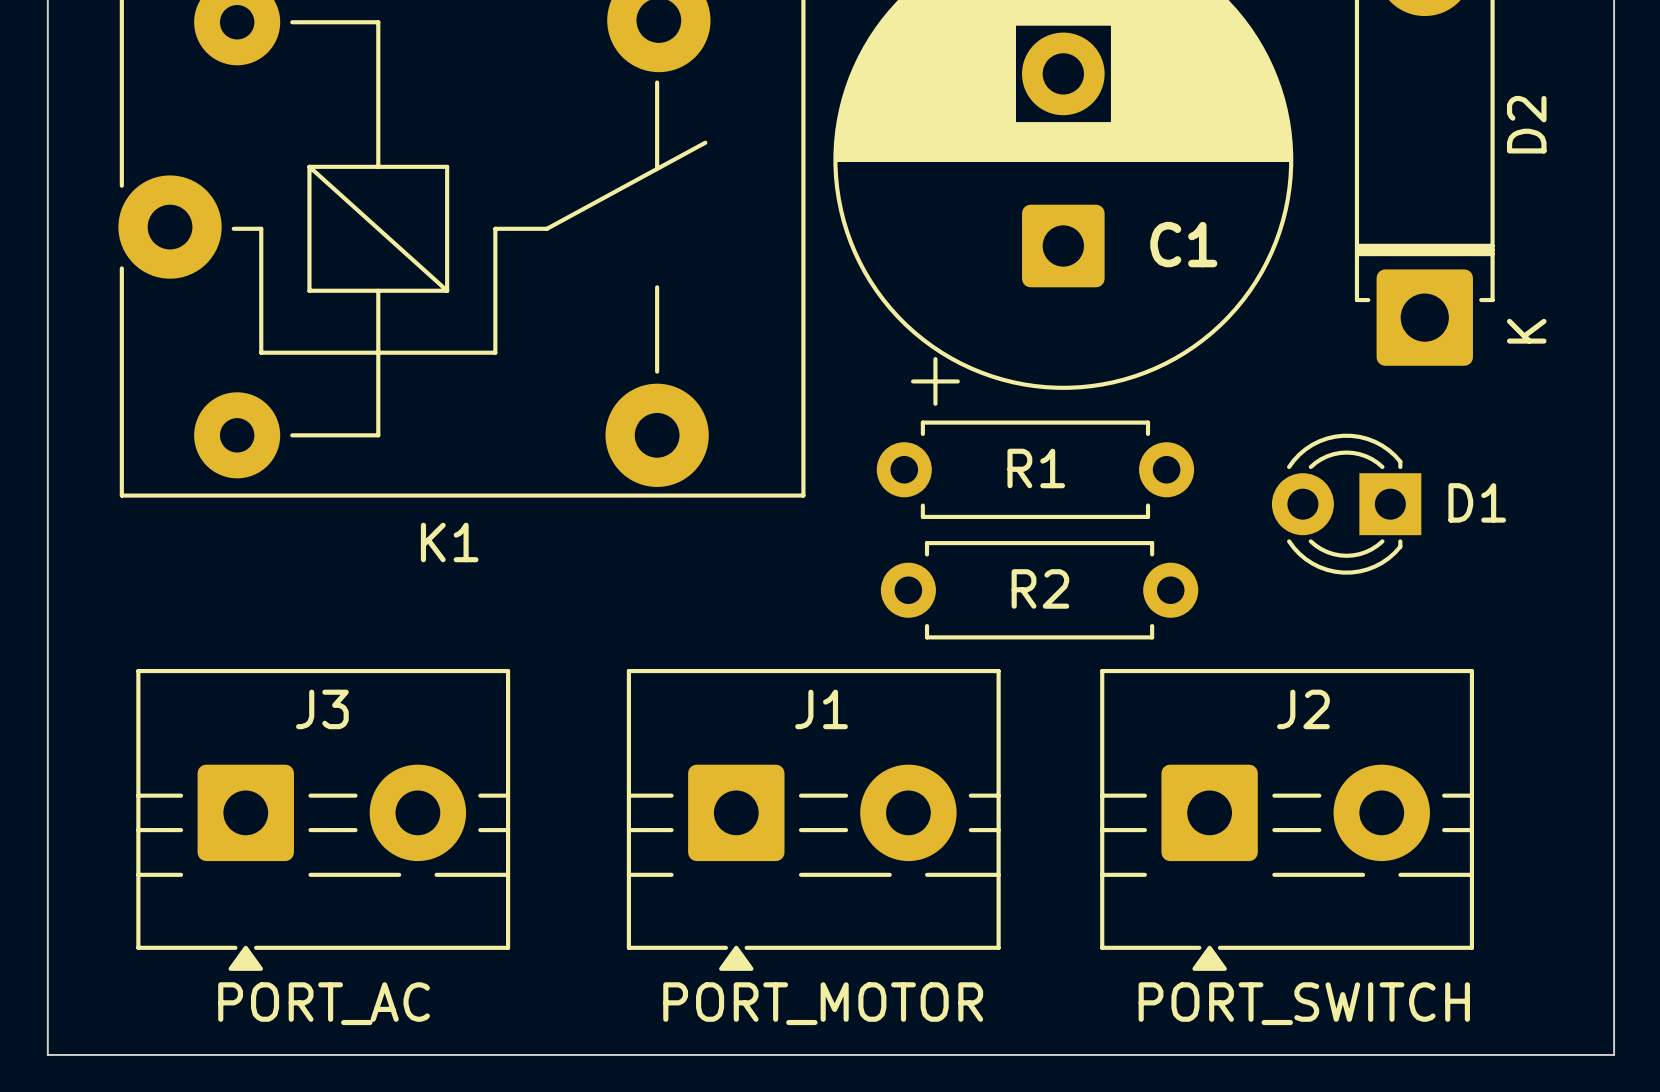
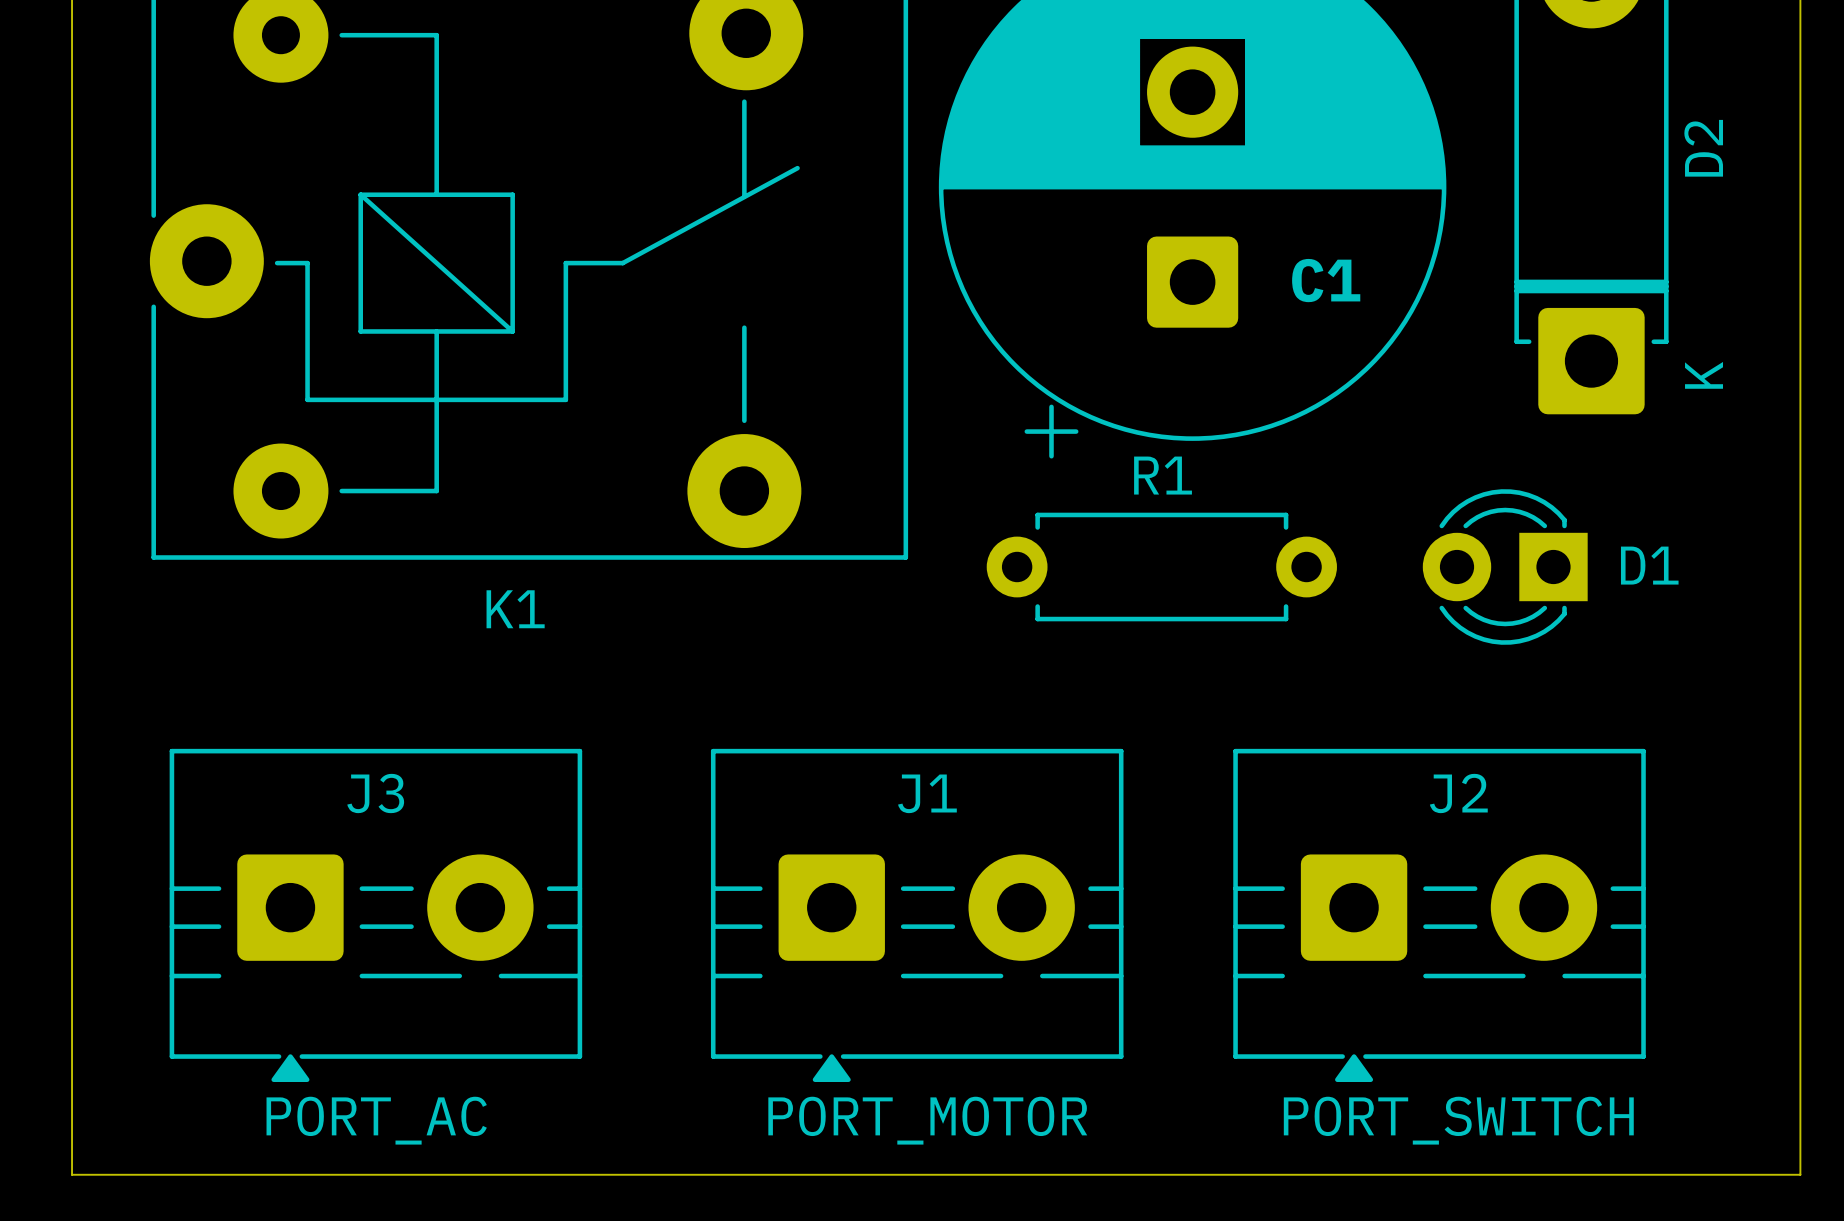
R1 name position: R1 (1036, 468) -> R1 (1163, 475)
R1 position: (1035, 469) -> (1161, 567)
R2: (1039, 590) -> none

